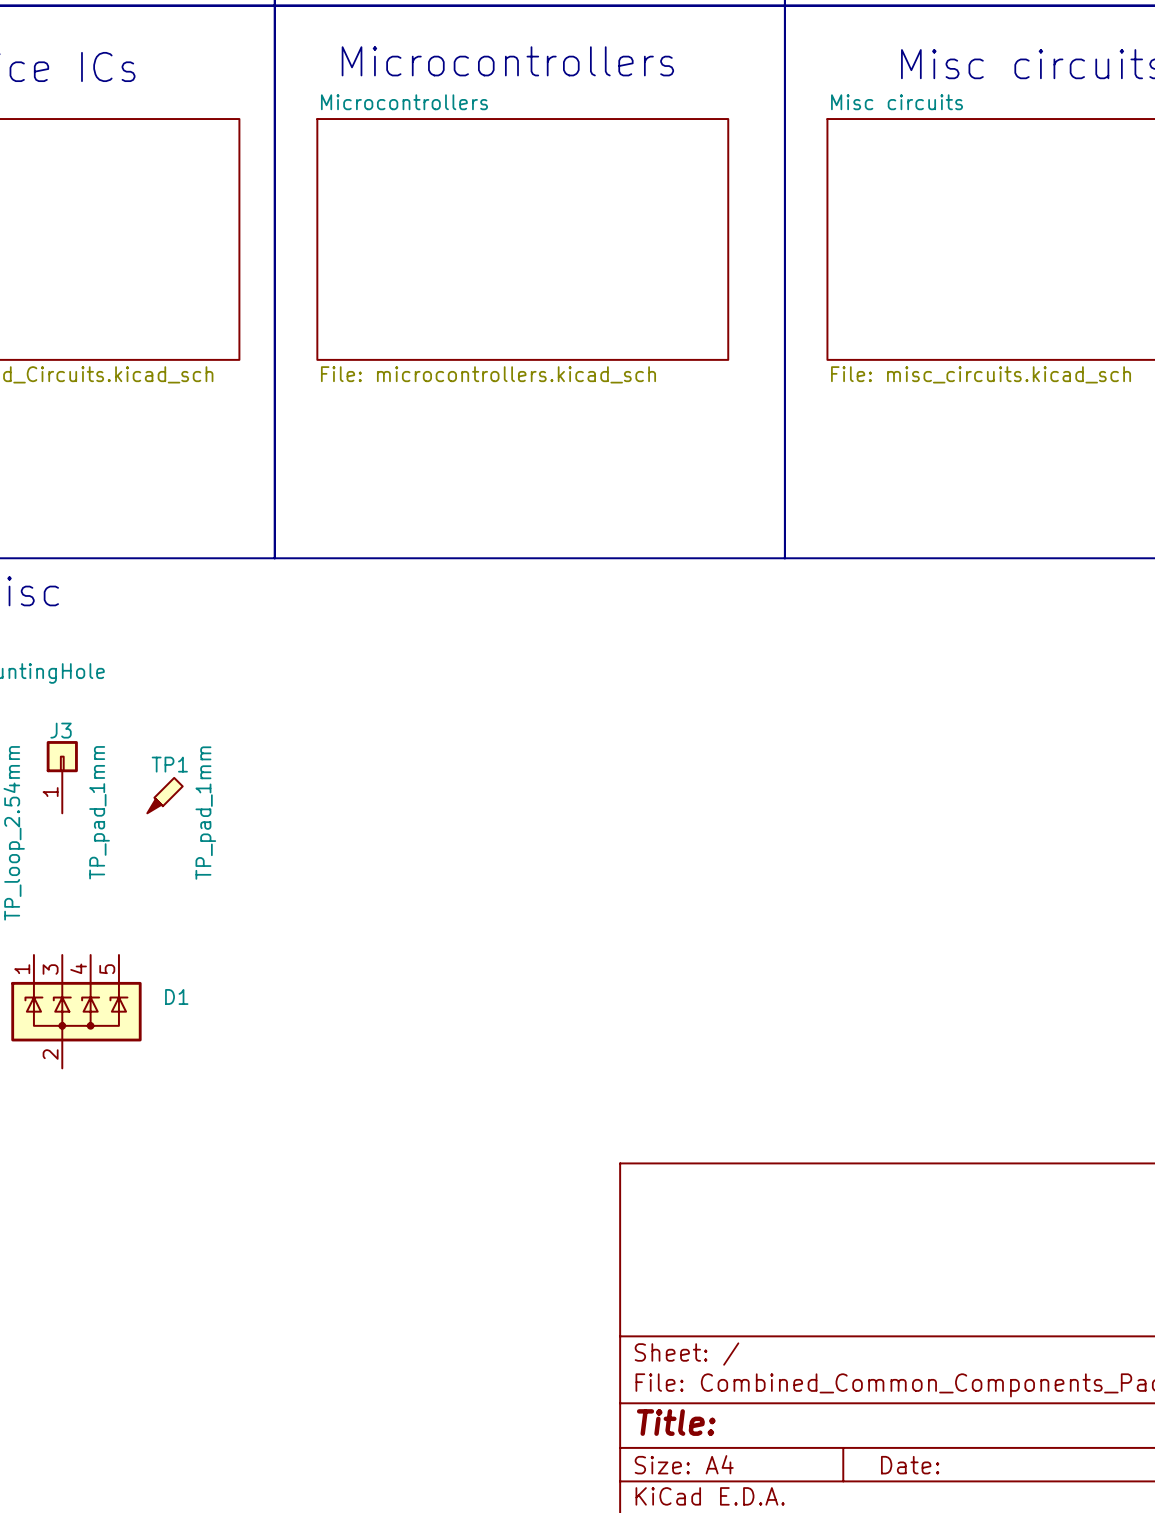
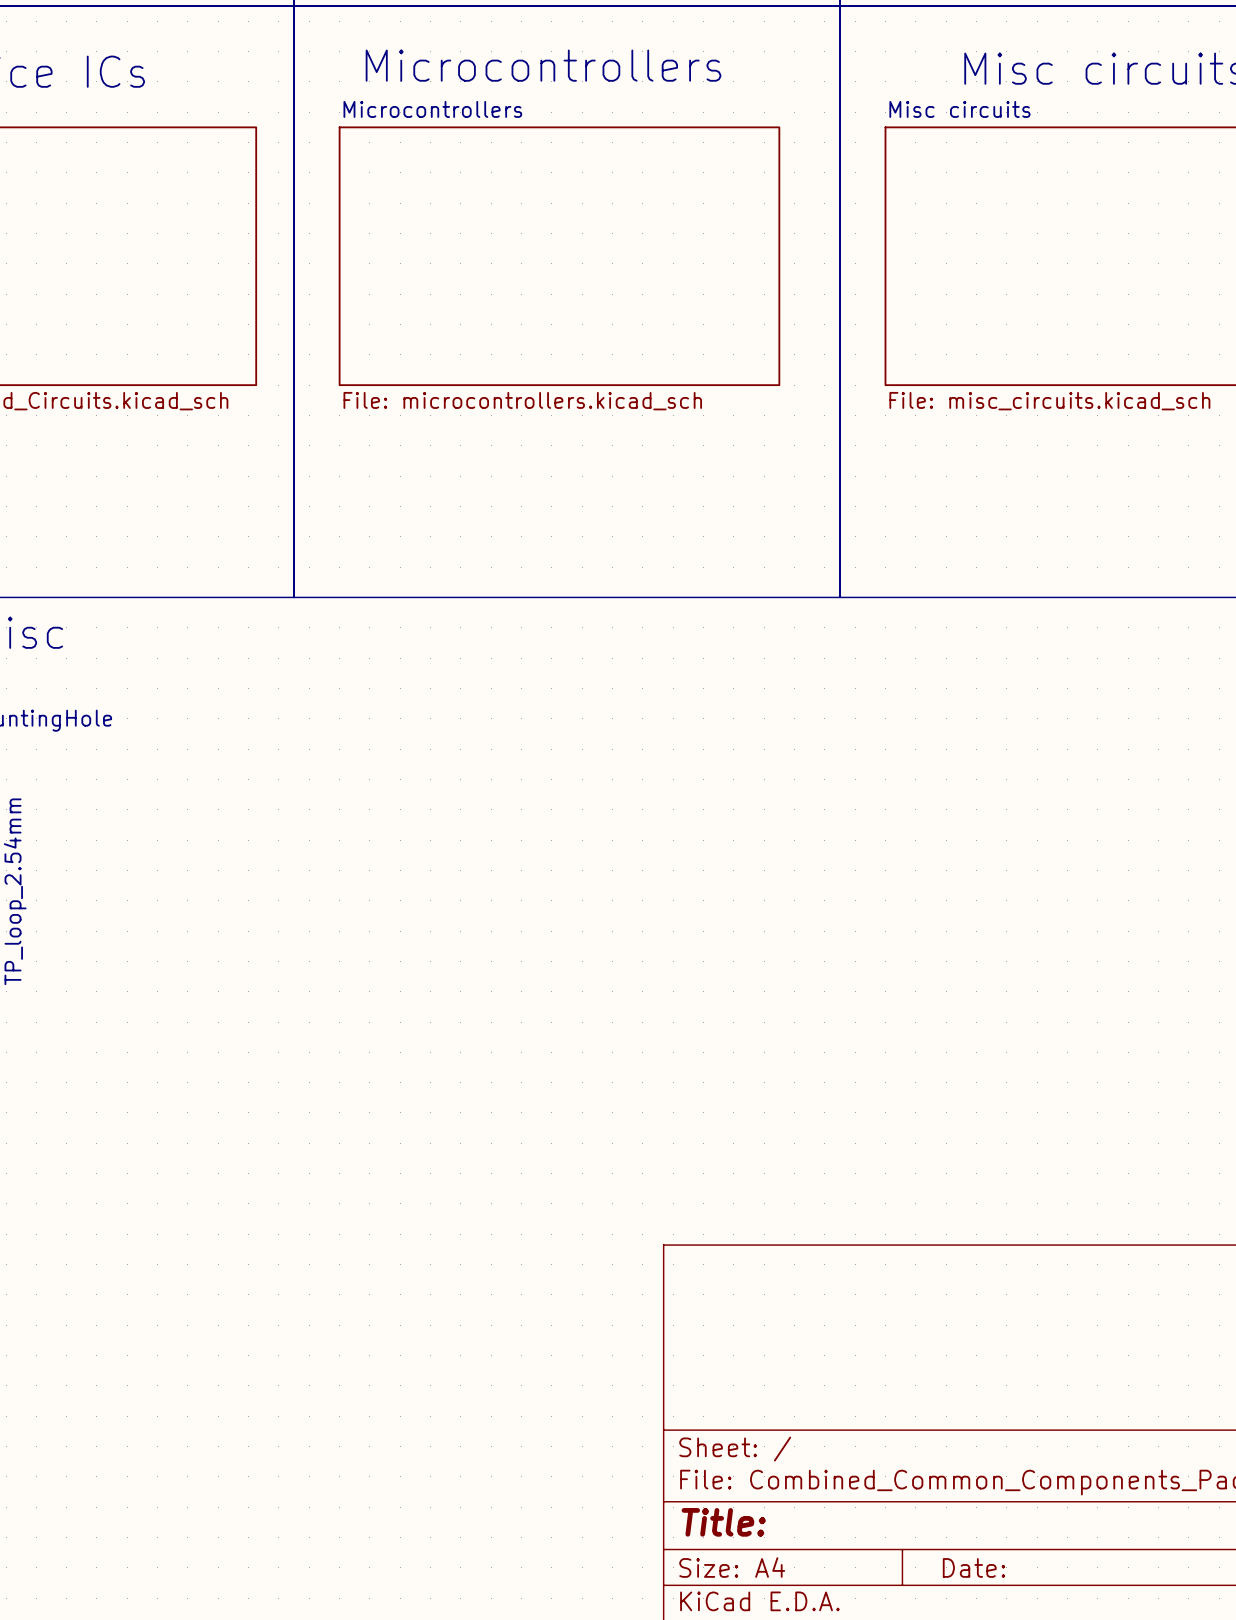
J3: TP_pad_1mm (62, 777) -> none
TP1: TP_pad_1mm (165, 795) -> none
D1: (76, 1011) -> none

